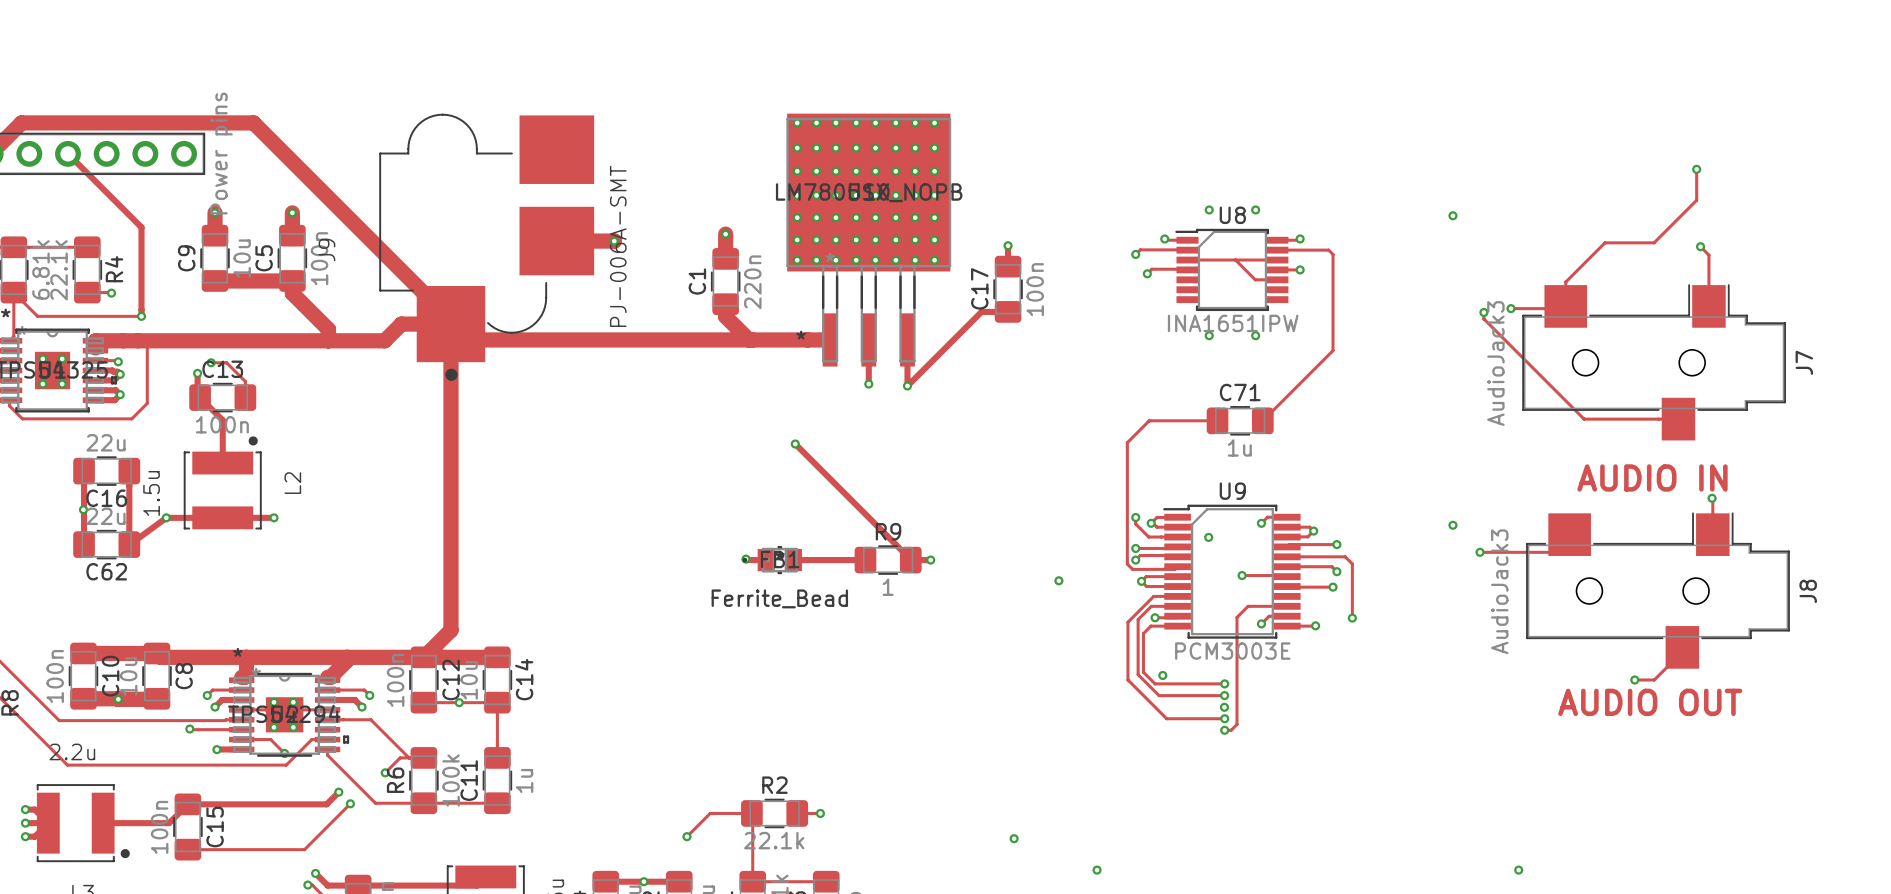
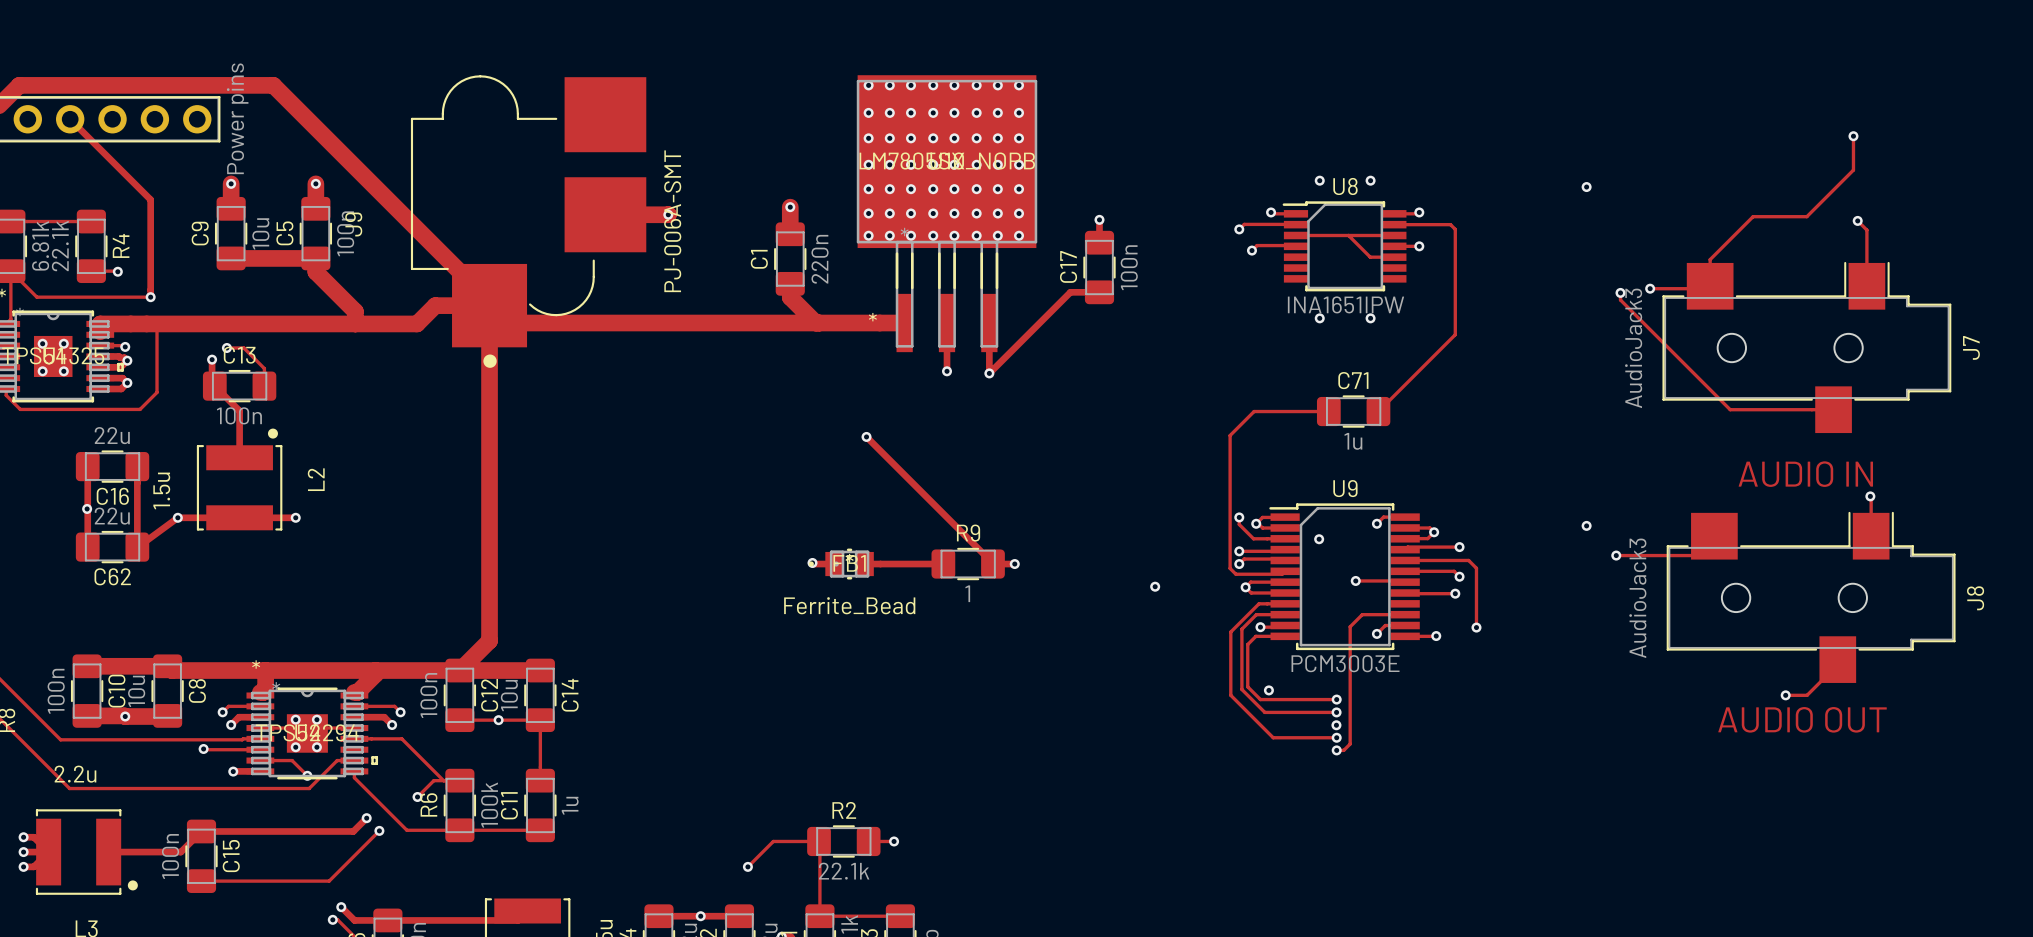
via: (1014, 838) -> none
via: (1097, 870) -> none
via: (1518, 870) -> none

